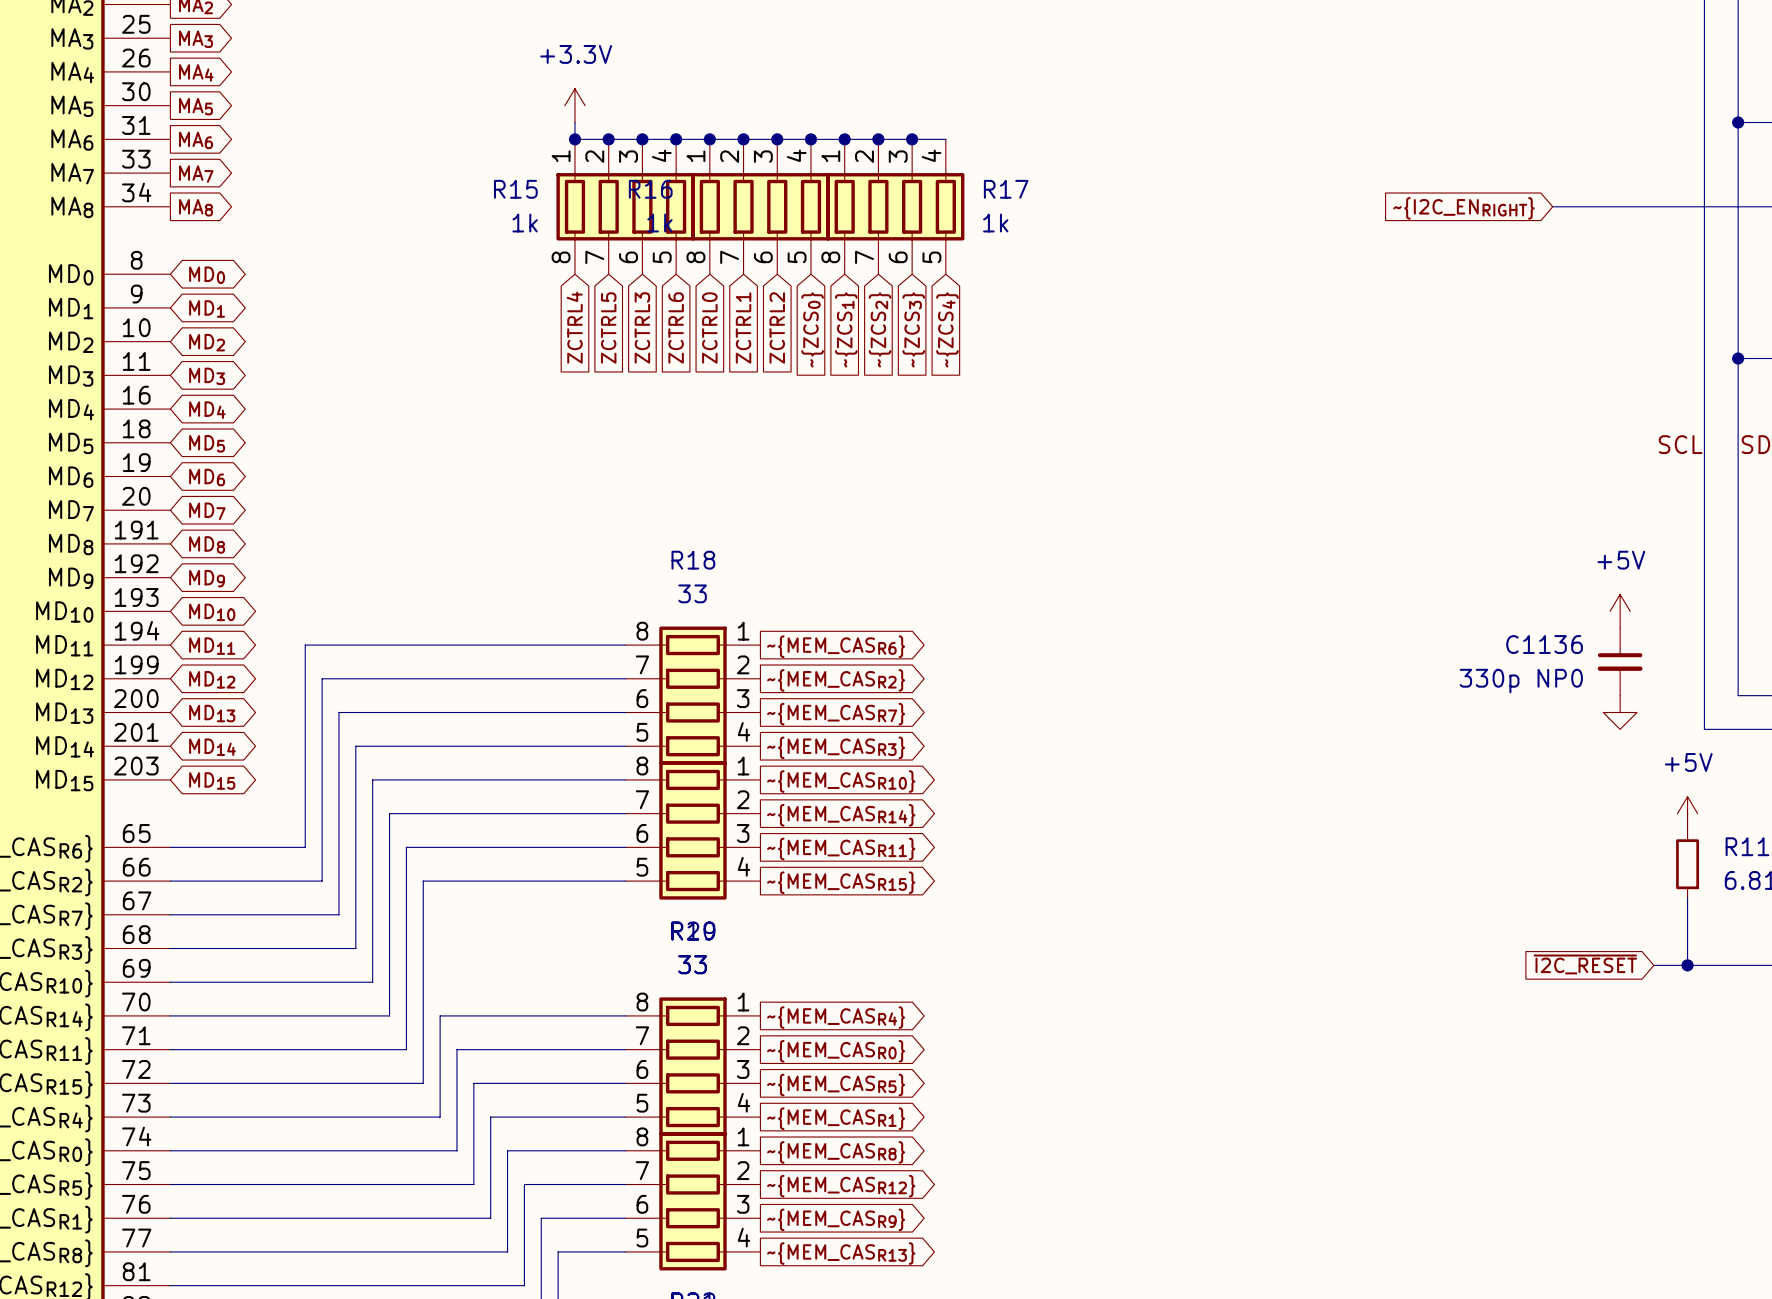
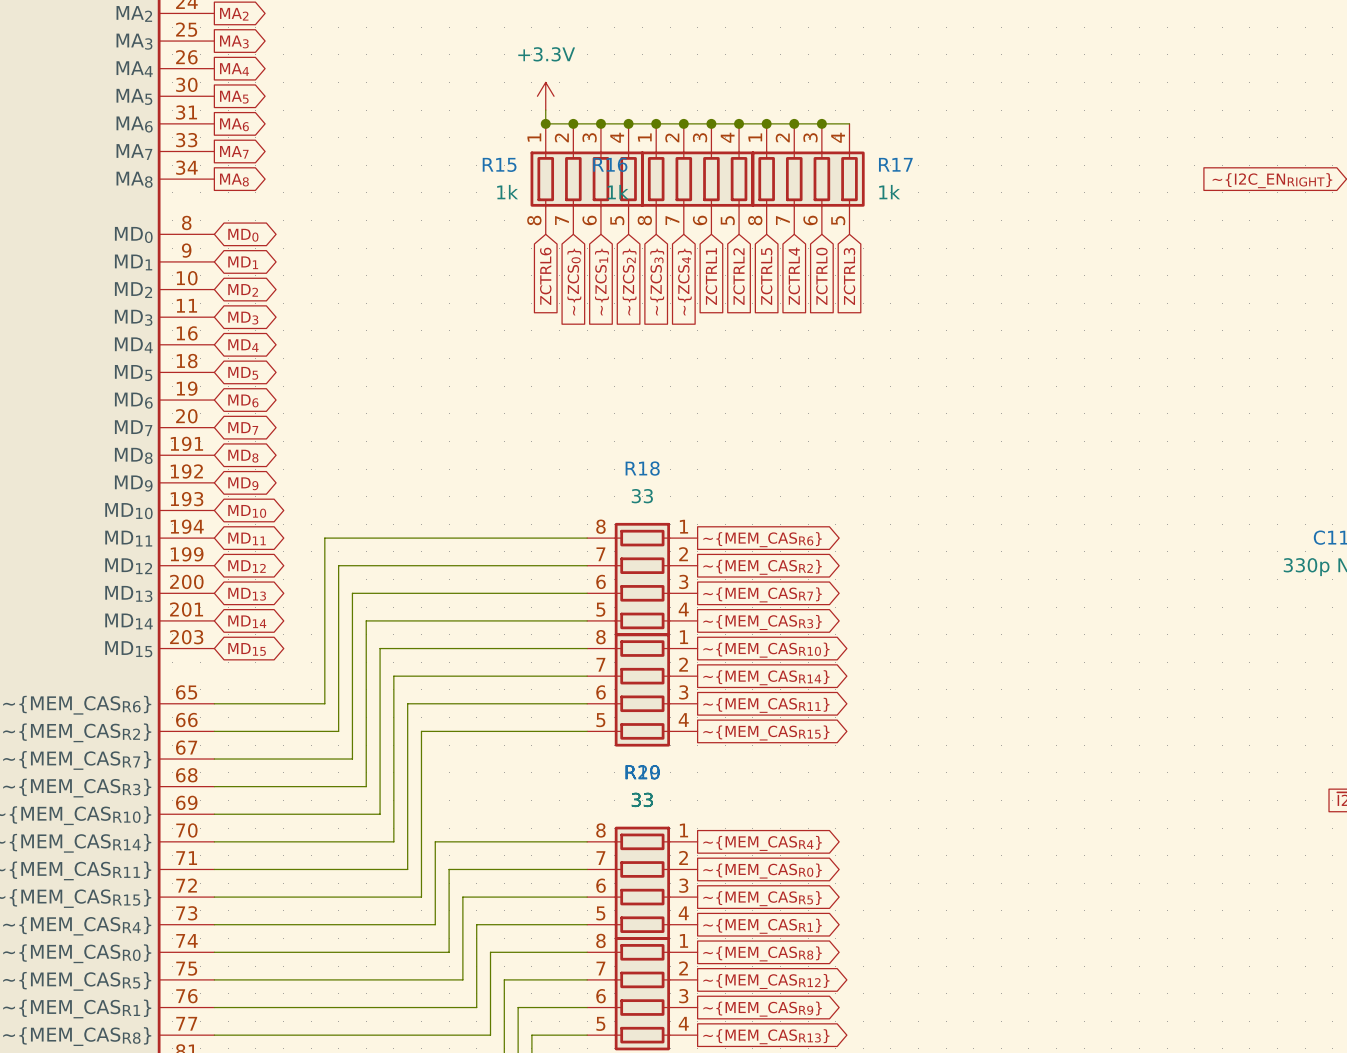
global label: ZCTRL4 (574, 327) -> ZCTRL6 (545, 276)
global label: ZCTRL5 (608, 327) -> ~{ZCS0} (574, 282)
global label: ZCTRL3 (642, 327) -> ~{ZCS1} (601, 282)
global label: ZCTRL6 (676, 327) -> ~{ZCS2} (629, 282)
global label: ZCTRL0 (709, 327) -> ~{ZCS3} (657, 282)
global label: ZCTRL1 (743, 327) -> ~{ZCS4} (684, 282)
global label: ZCTRL2 (777, 327) -> ZCTRL1 (711, 276)
global label: ~{ZCS0} (812, 329) -> ZCTRL2 (739, 276)
global label: ~{ZCS1} (846, 329) -> ZCTRL5 (766, 276)
global label: ~{ZCS2} (880, 329) -> ZCTRL4 (794, 276)
global label: ~{ZCS3} (913, 329) -> ZCTRL0 (821, 276)
global label: ~{ZCS4} (947, 329) -> ZCTRL3 (849, 276)

